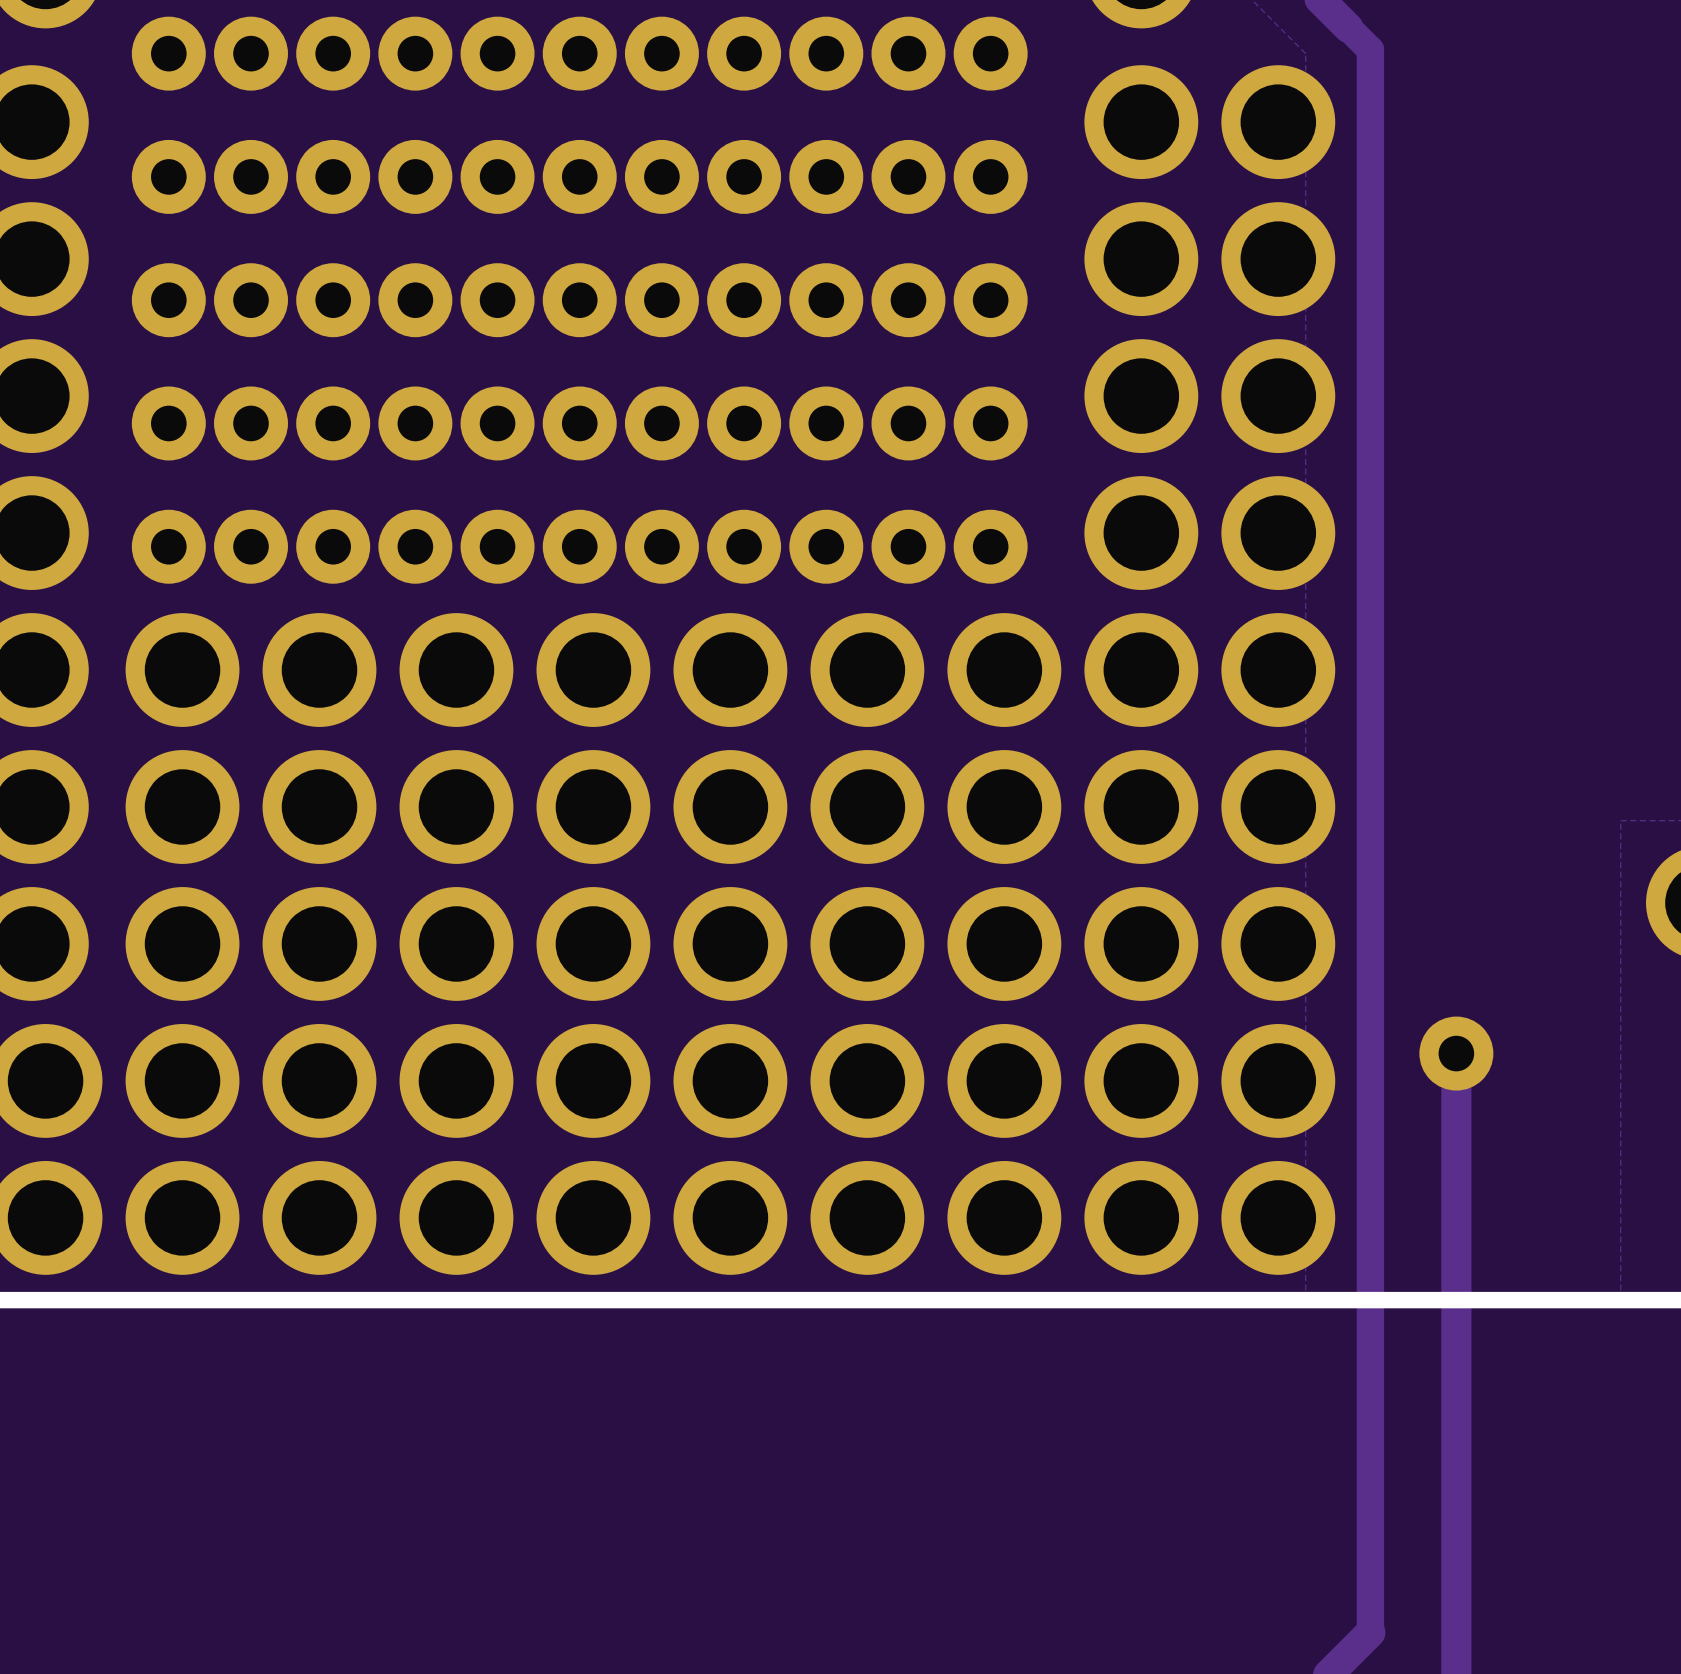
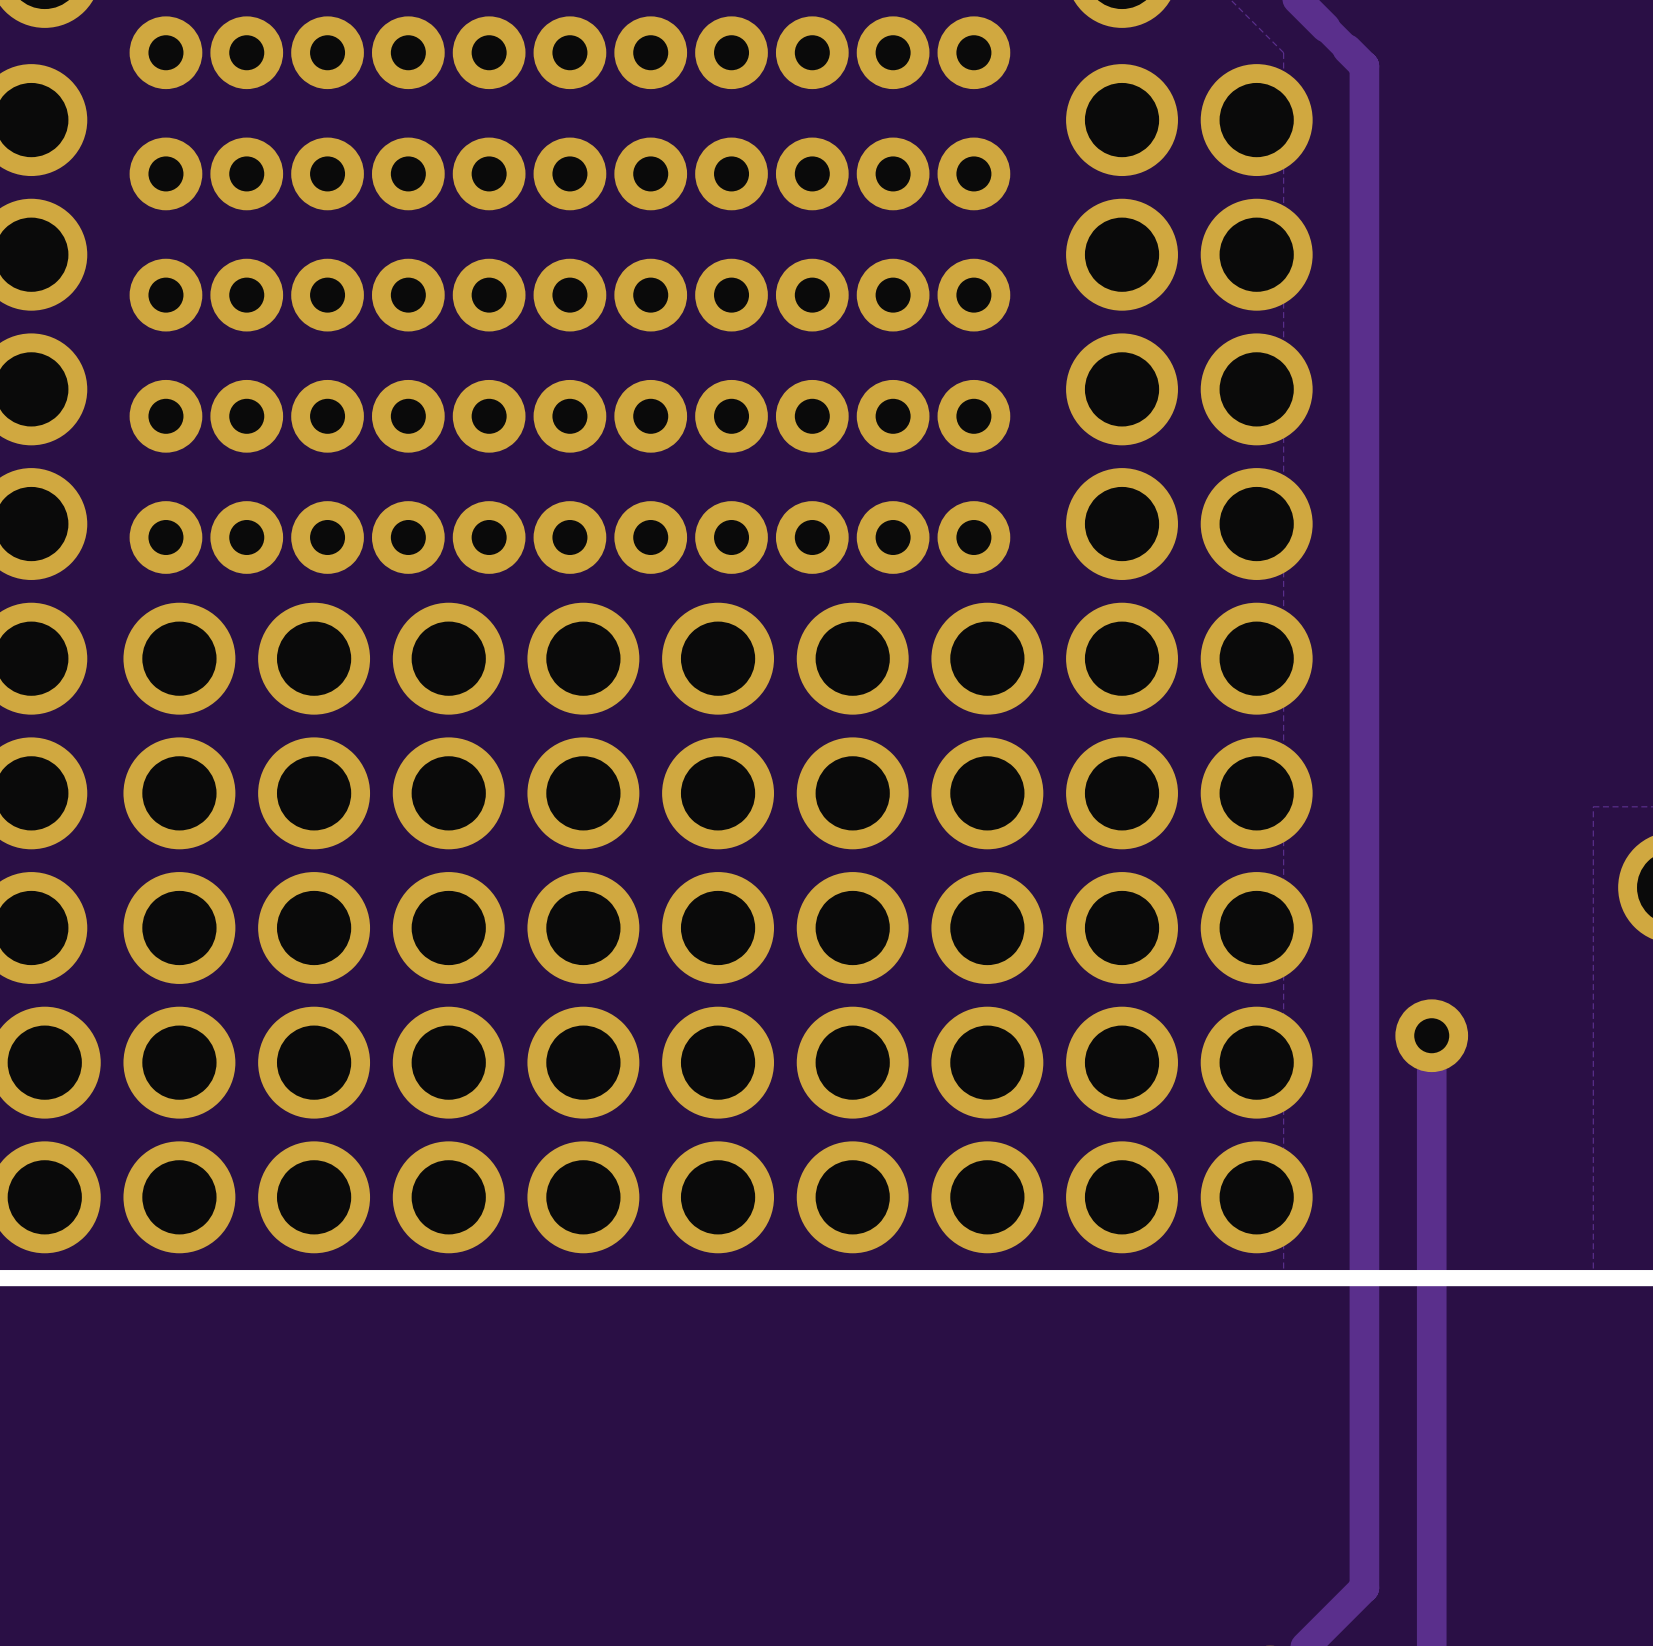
track: (1370, 49) (1370, 1632) -> (1347, 49) (1364, 66) (1364, 1587) (1347, 1604)

